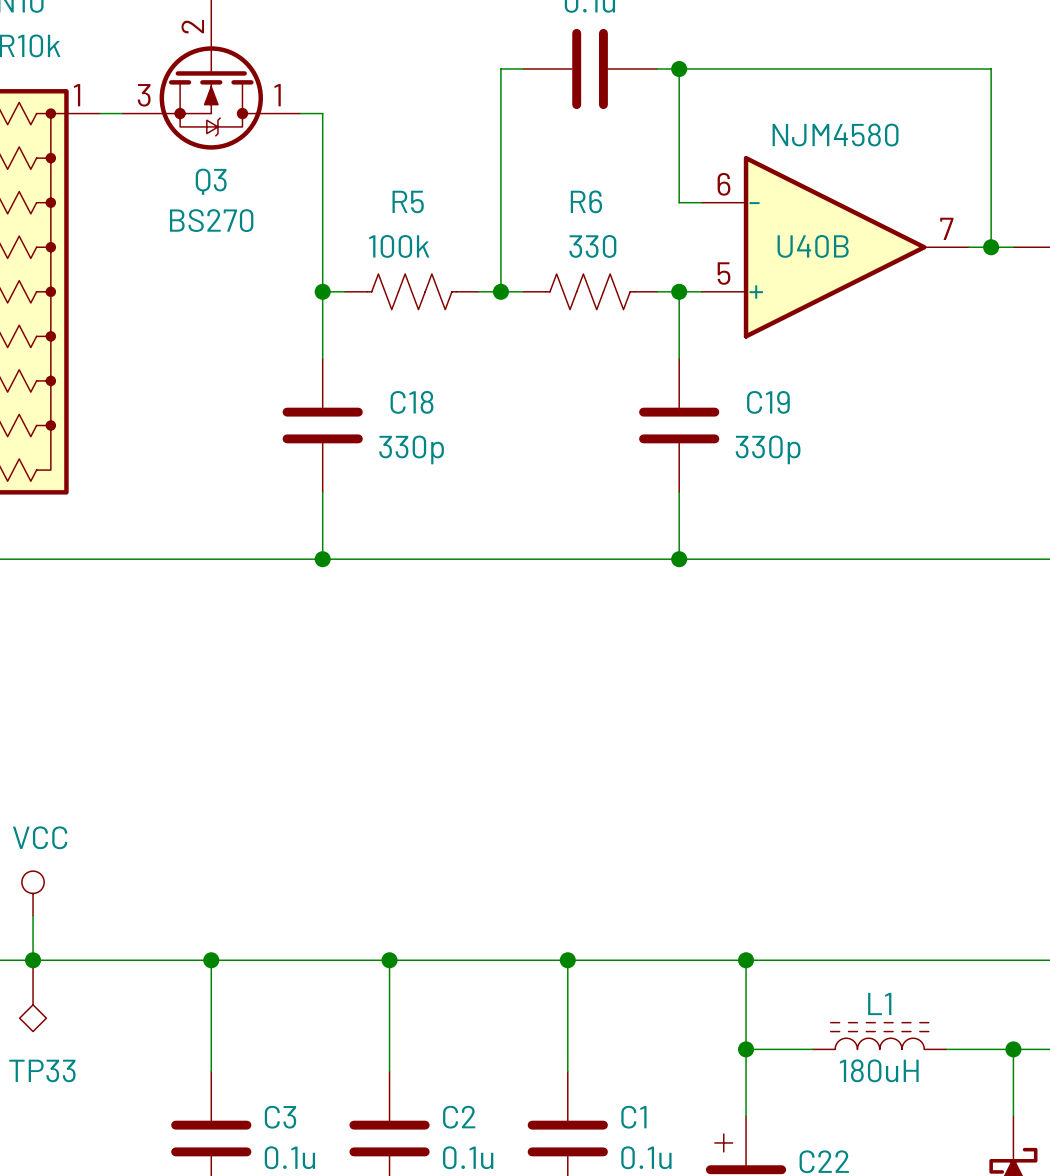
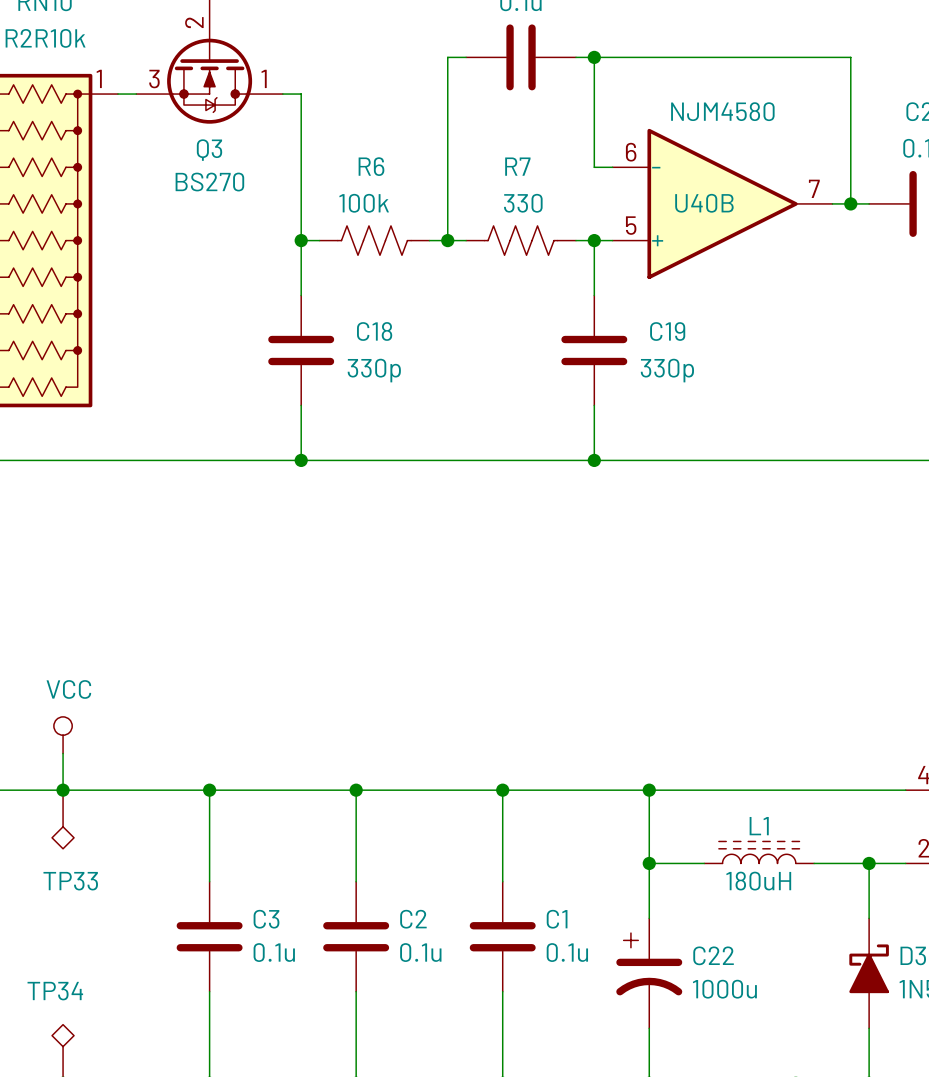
R5 name: R5 (408, 201) -> R6 (371, 166)
R6 name: R6 (586, 201) -> R7 (517, 166)

